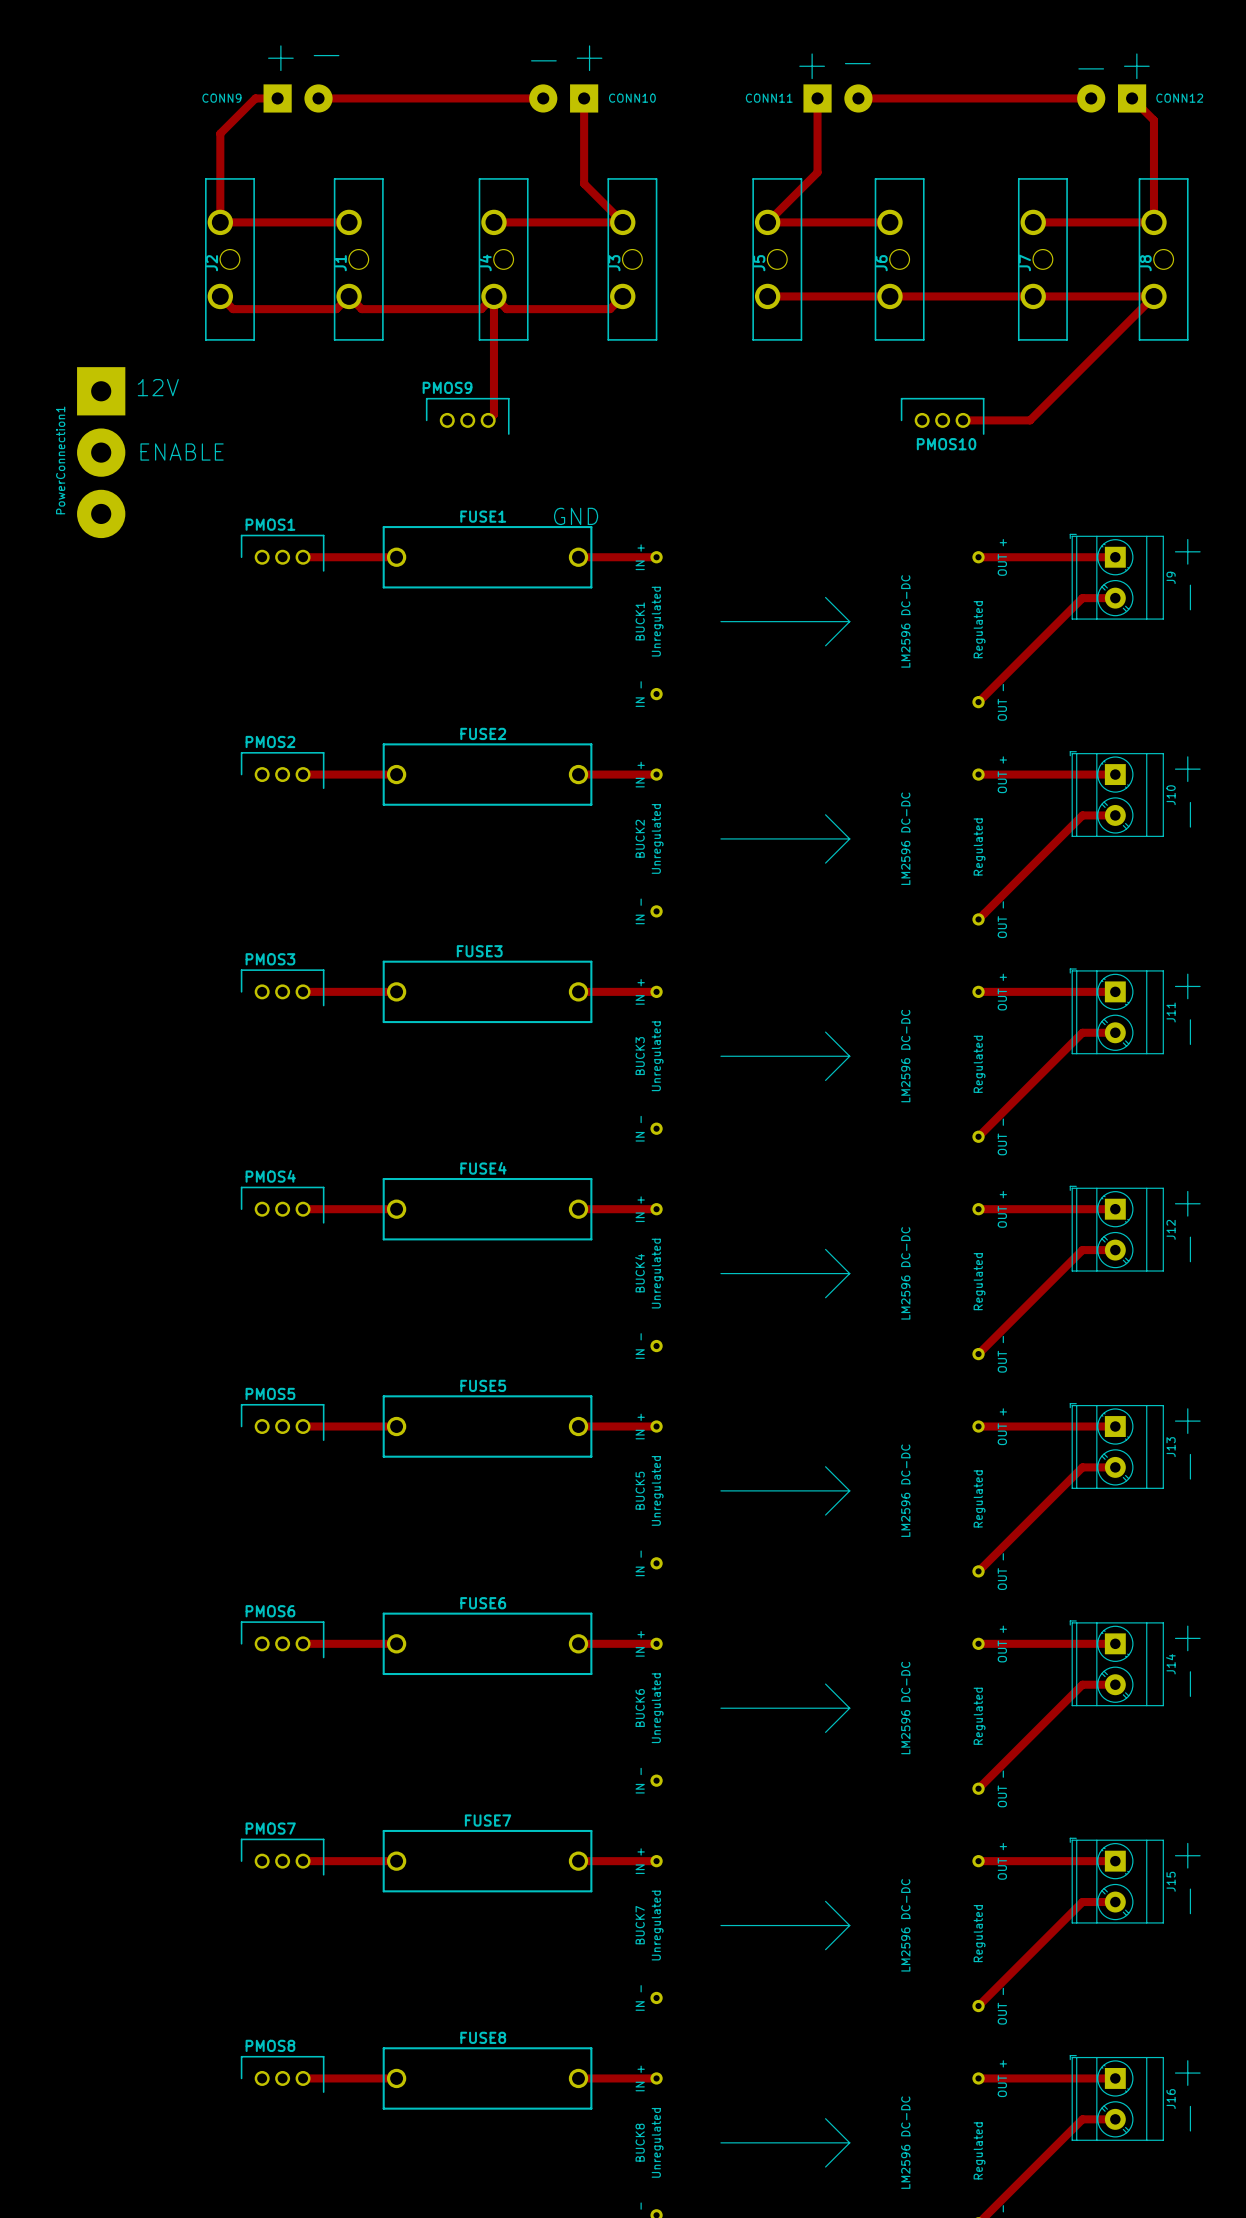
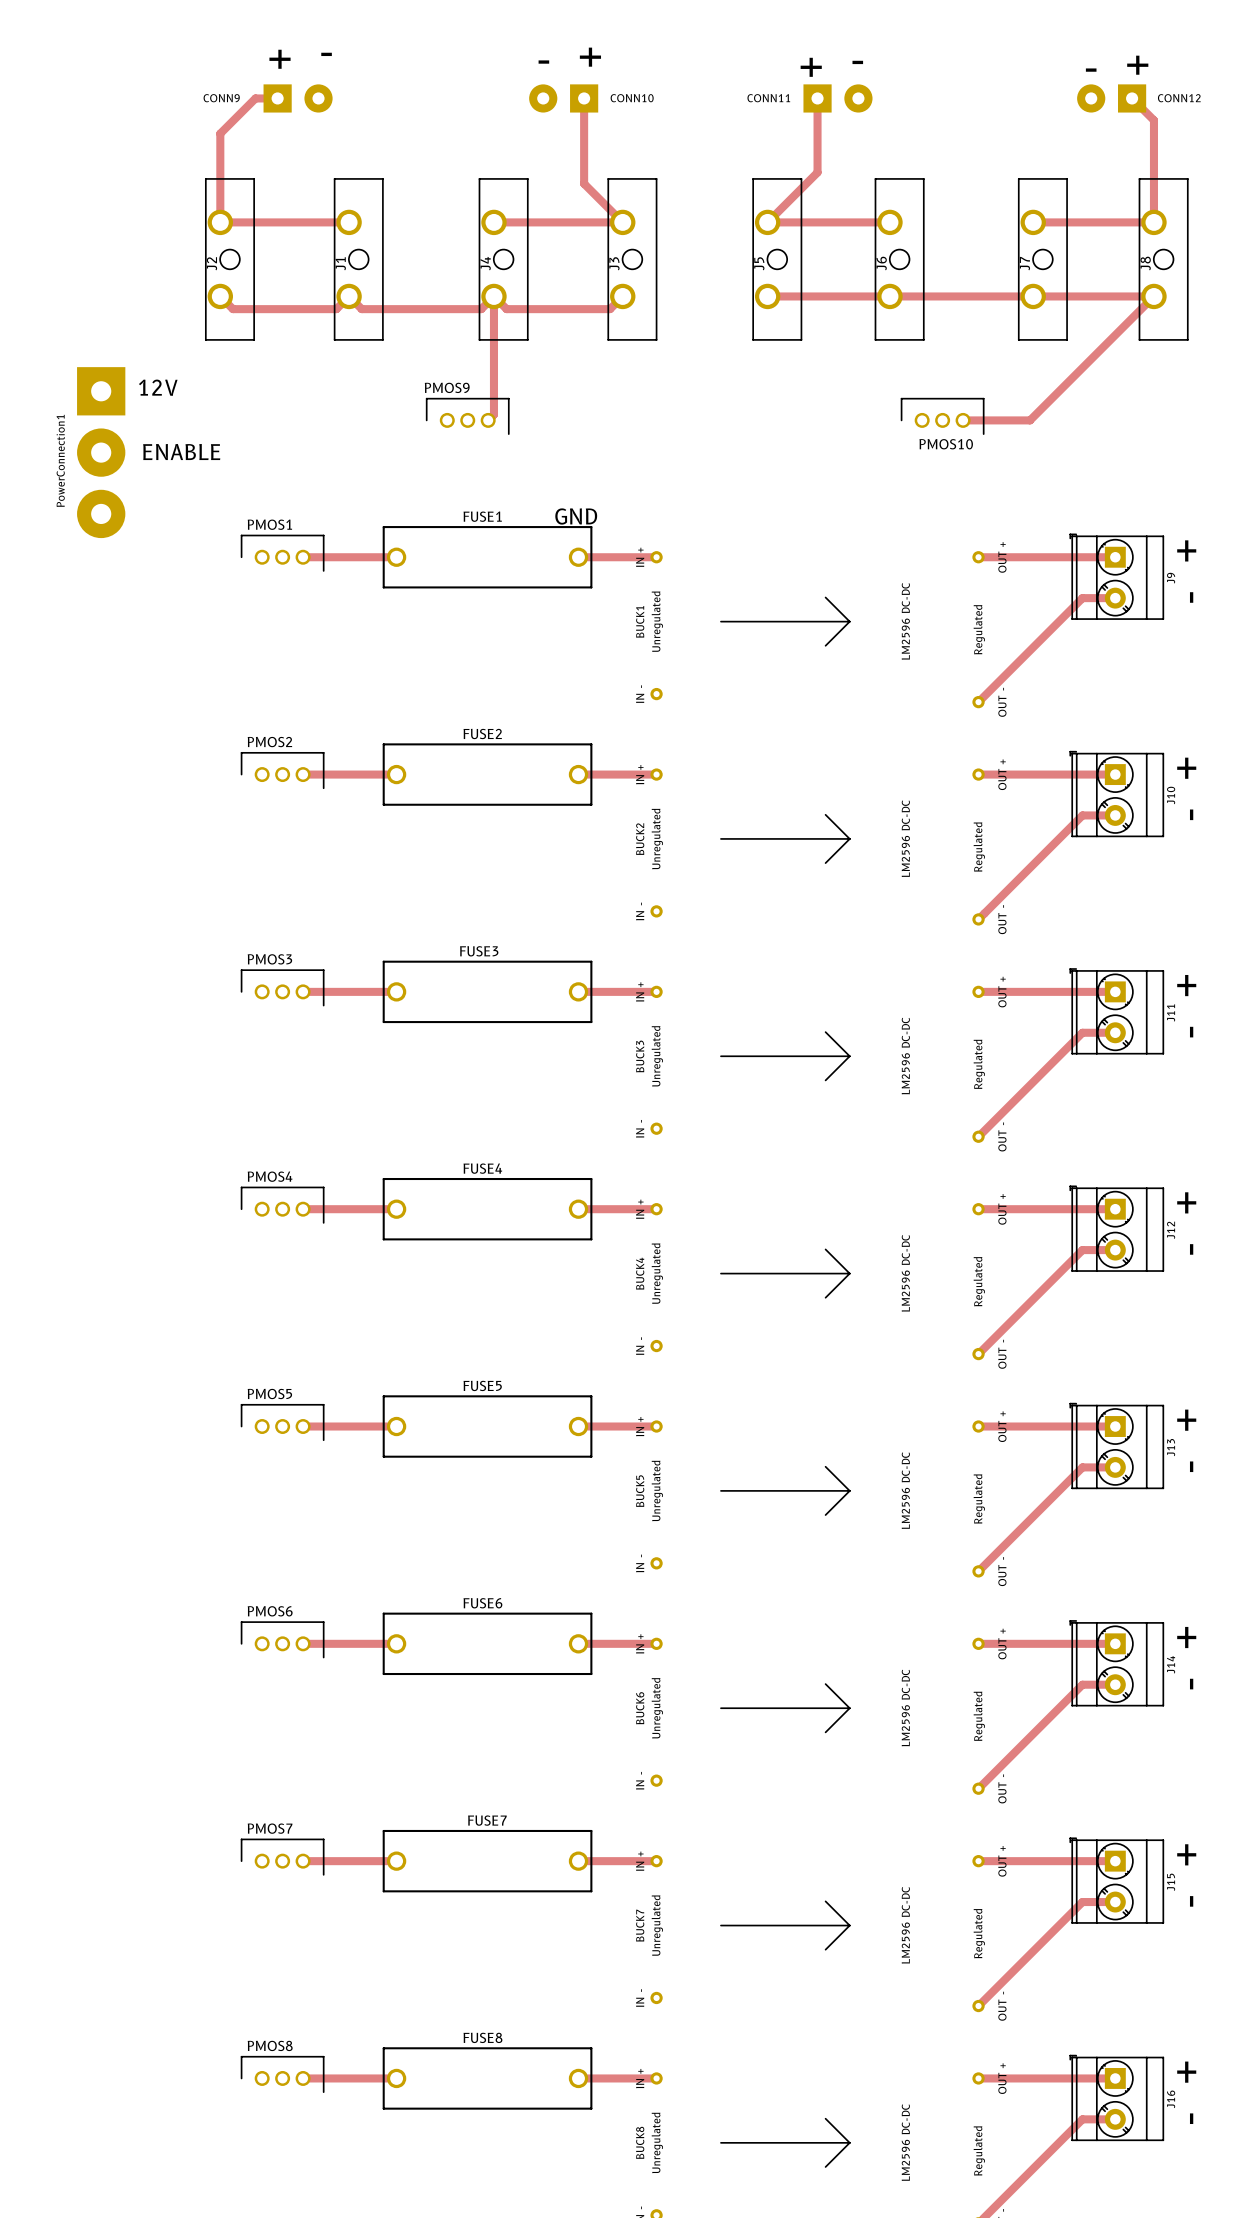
track: (318, 98) (543, 98) -> none
track: (858, 98) (1091, 98) -> none

